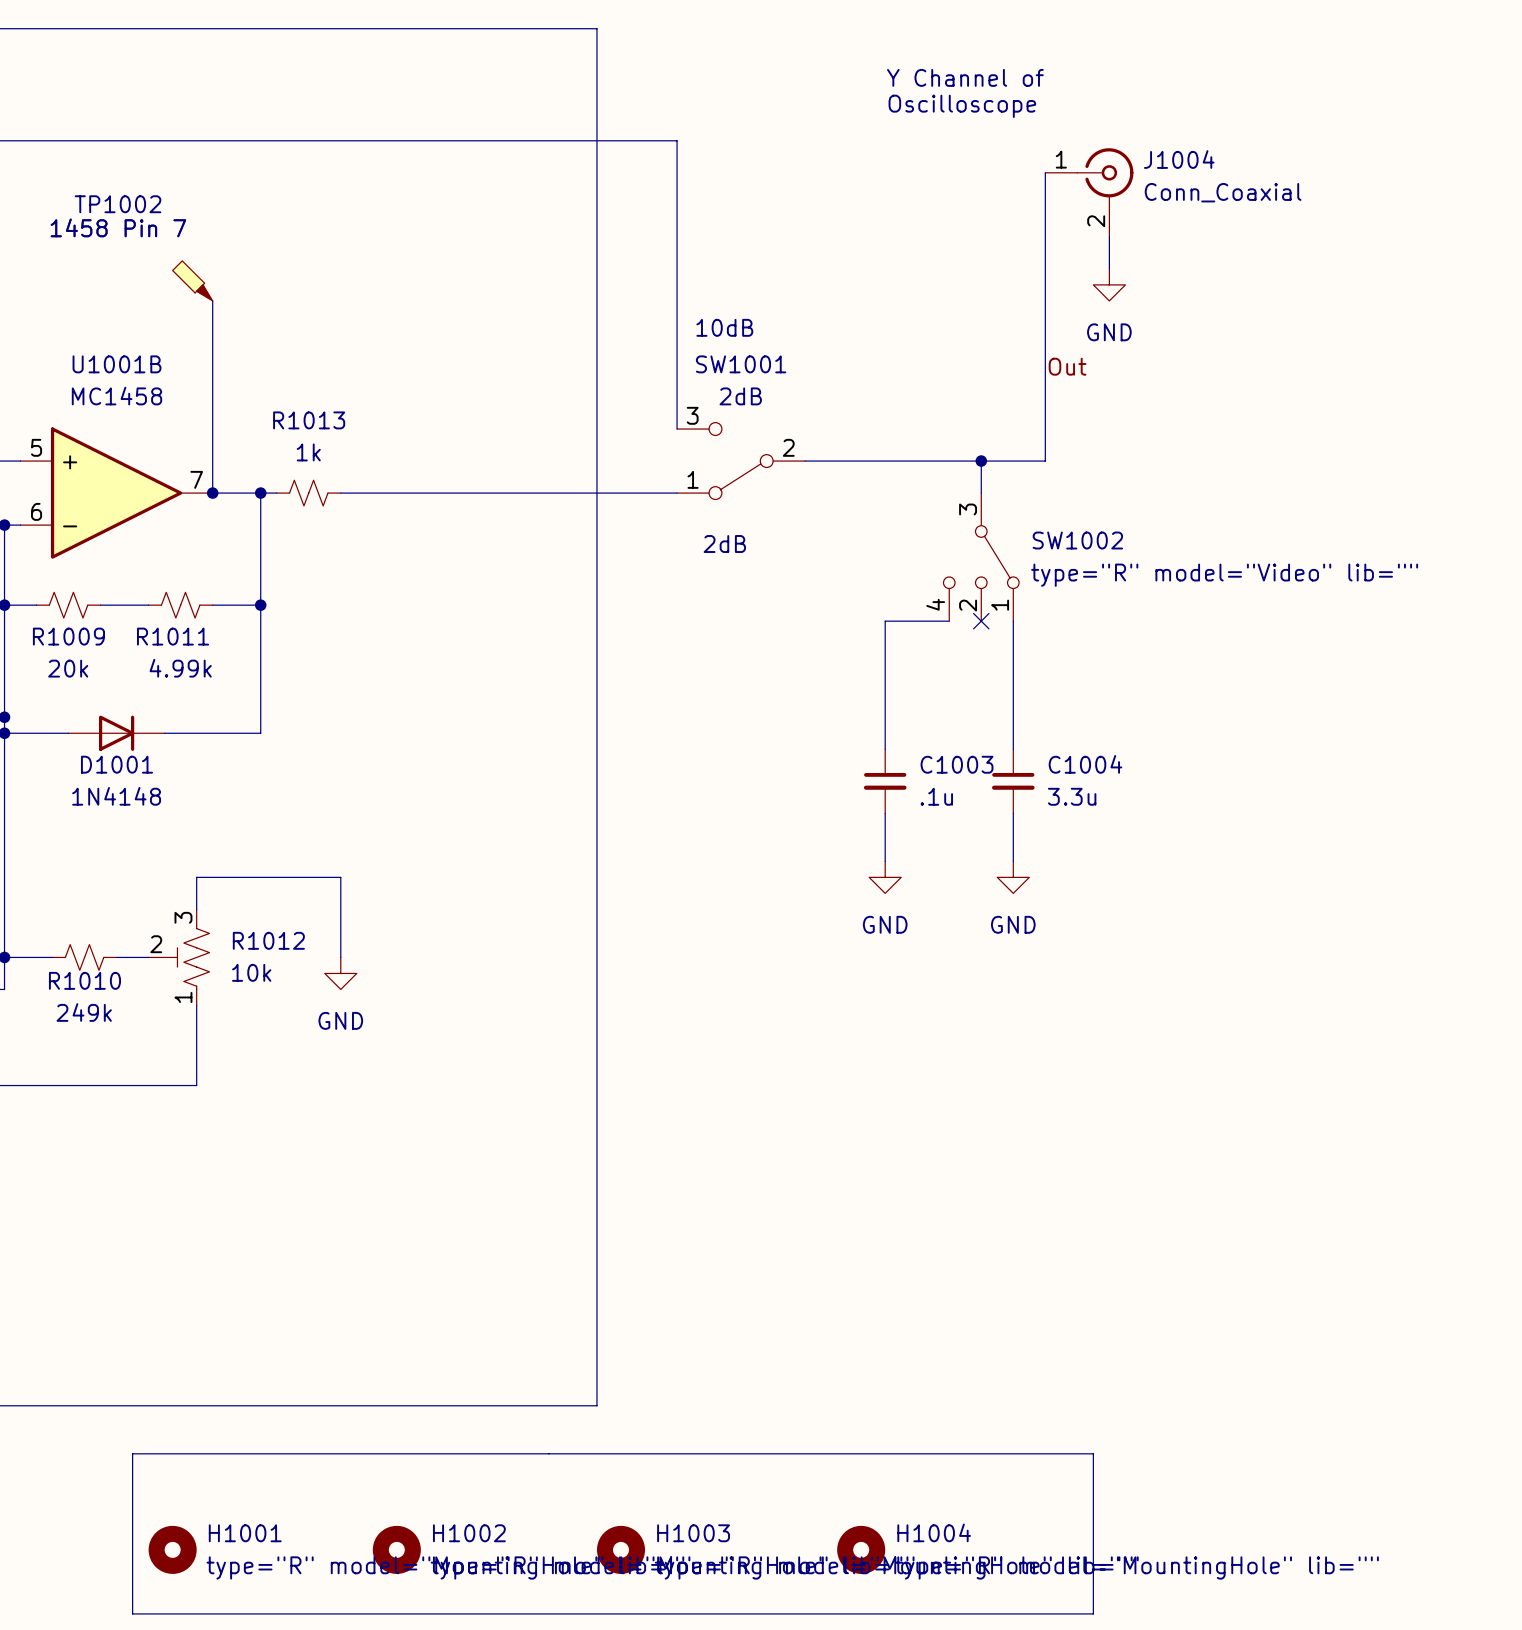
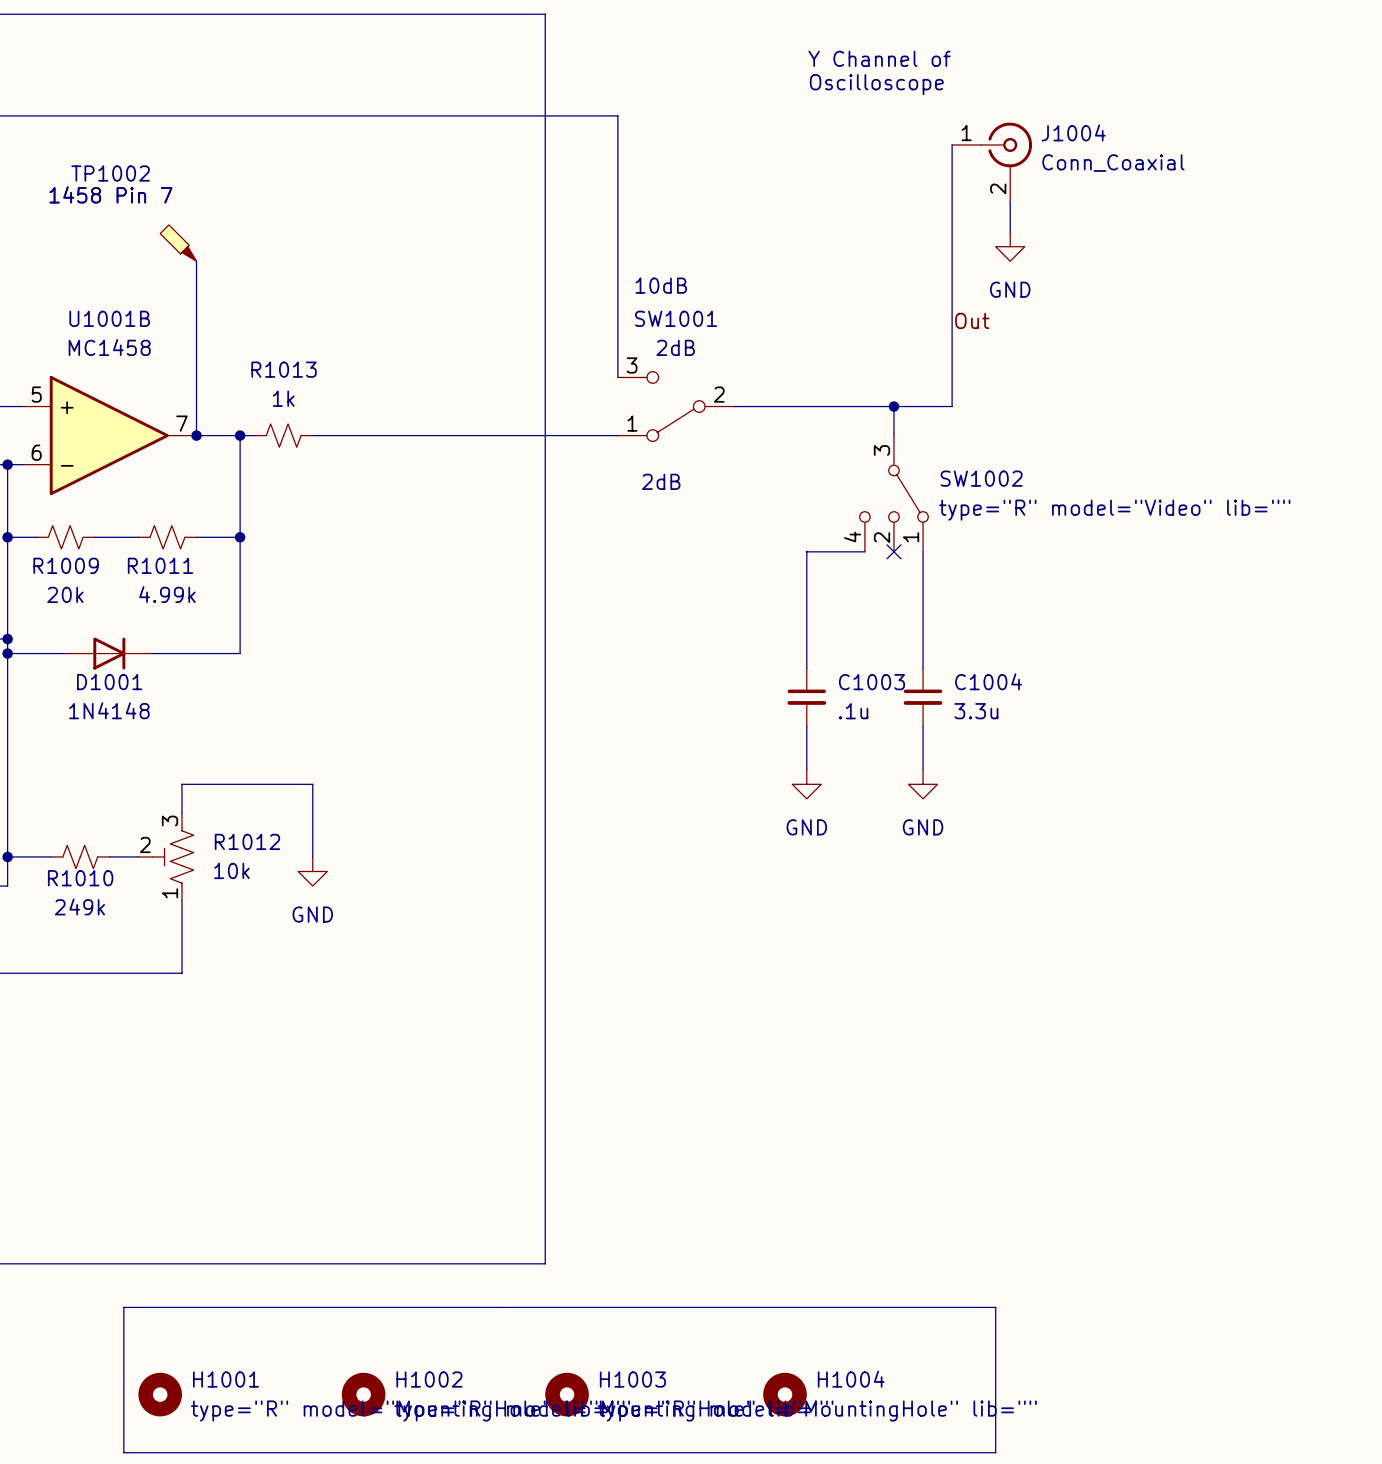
H1004 value: type="R" model="MountingHole" lib="" (1136, 1567) -> none

